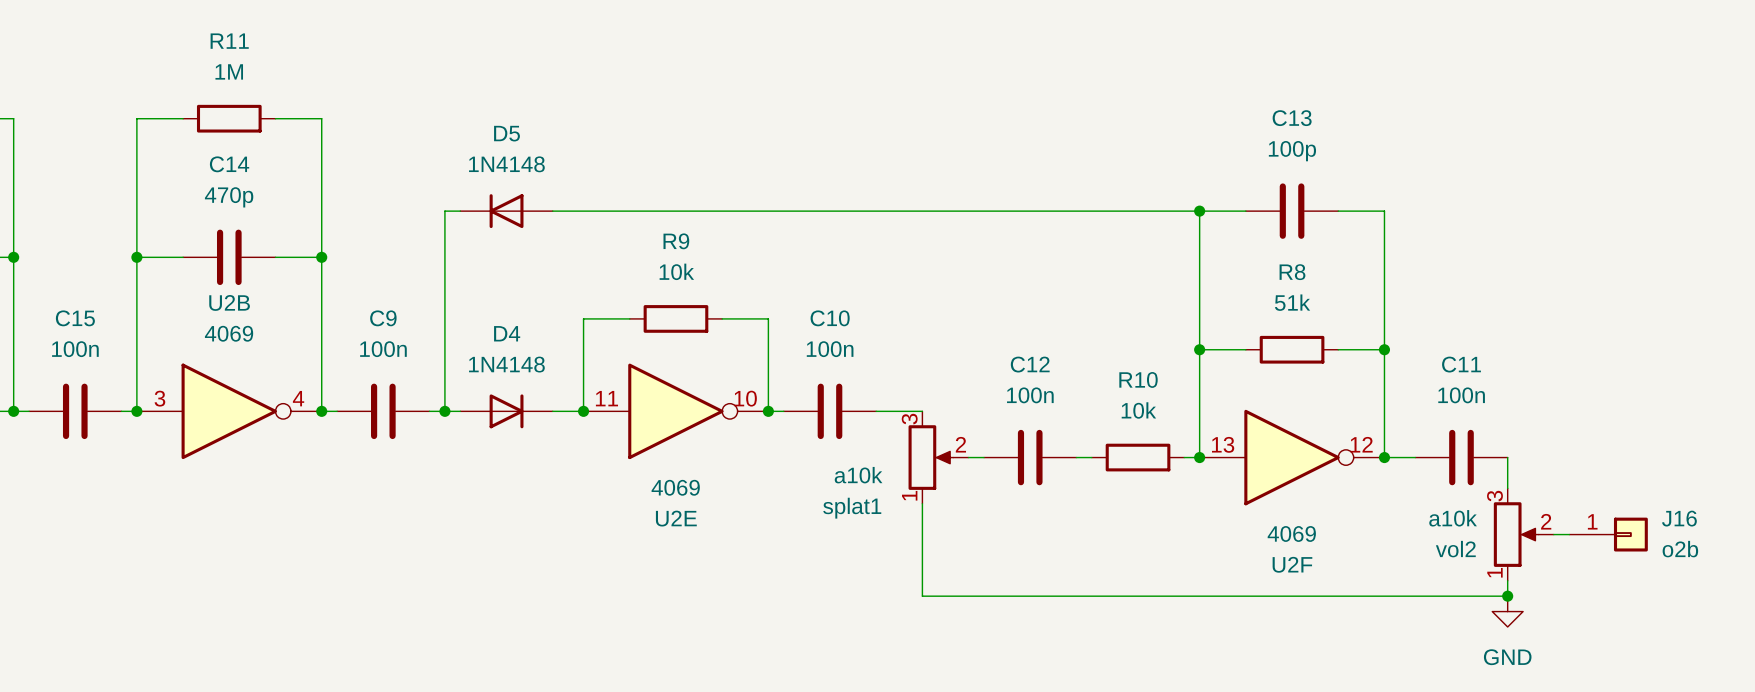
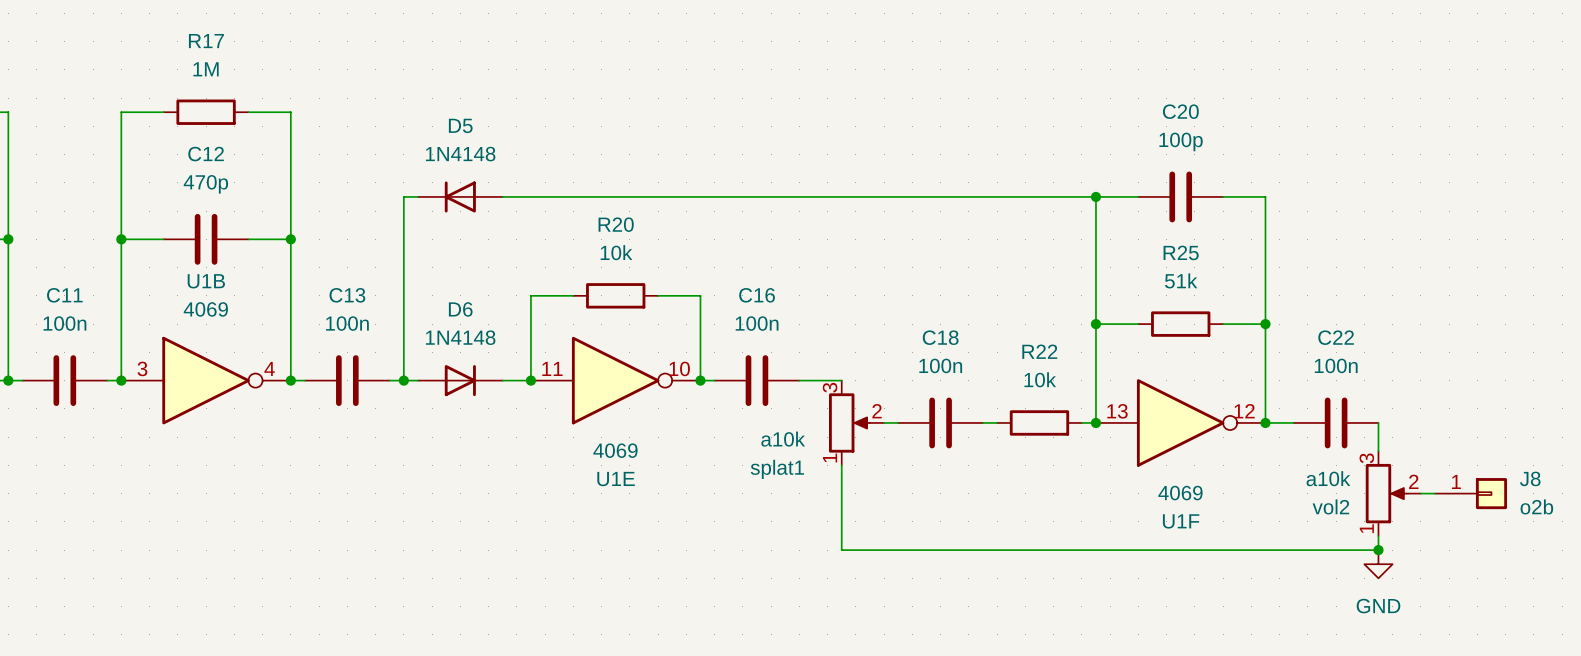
R11 name: R11 (229, 41) -> R17 (206, 41)
C13 name: C13 (1292, 118) -> C20 (1180, 111)
C14 name: C14 (229, 164) -> C12 (206, 154)
R9 name: R9 (676, 241) -> R20 (616, 224)
R8 name: R8 (1292, 272) -> R25 (1181, 252)
U2B name: U2B (229, 302) -> U1B (206, 281)
C15 name: C15 (75, 318) -> C11 (64, 295)
C9 name: C9 (383, 318) -> C13 (347, 295)
C10 name: C10 (830, 318) -> C16 (757, 295)
D4 name: D4 (507, 333) -> D6 (460, 309)
C12 name: C12 (1030, 364) -> C18 (940, 337)
C11 name: C11 (1461, 364) -> C22 (1336, 337)
R10 name: R10 (1138, 379) -> R22 (1039, 351)
U2E name: U2E (676, 518) -> U1E (616, 479)
J16 name: J16 (1679, 518) -> J8 (1530, 478)
U2F name: U2F (1292, 564) -> U1F (1181, 521)

